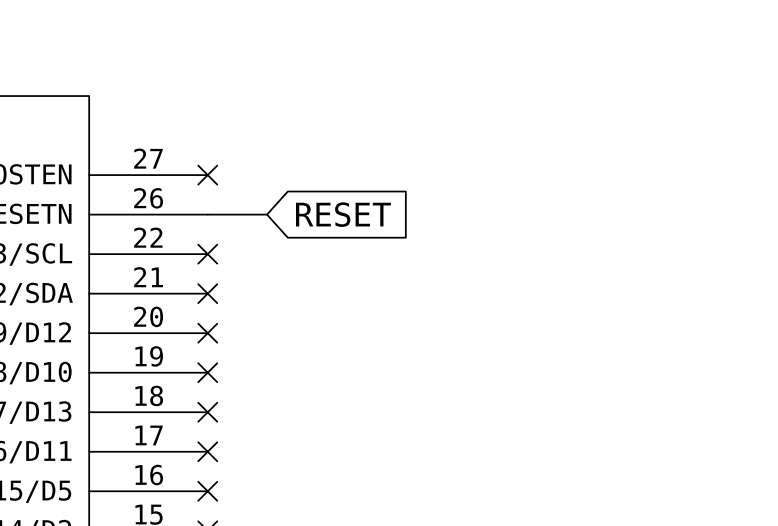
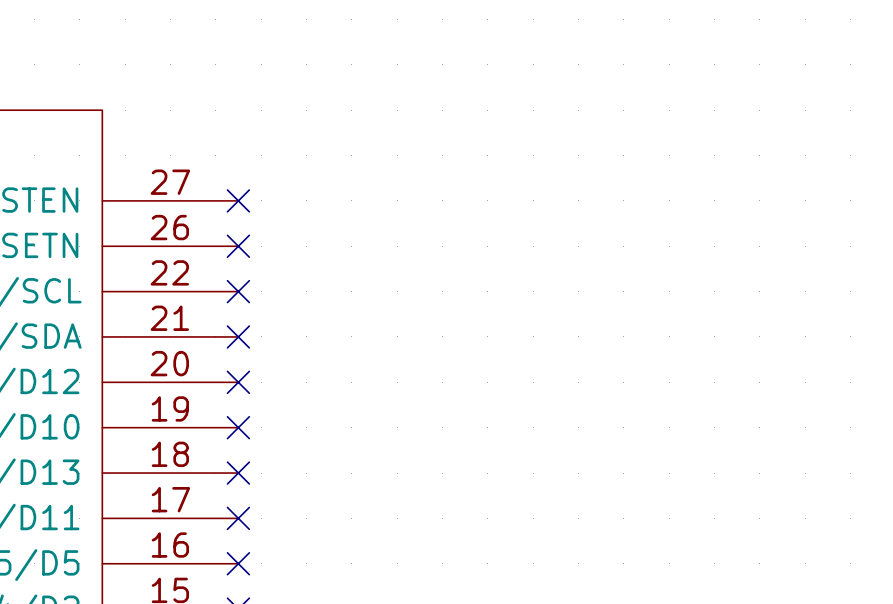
wire: (207, 214) (267, 214) -> none
no-connect mark: none -> (238, 246)
global label: RESET (343, 214) -> none

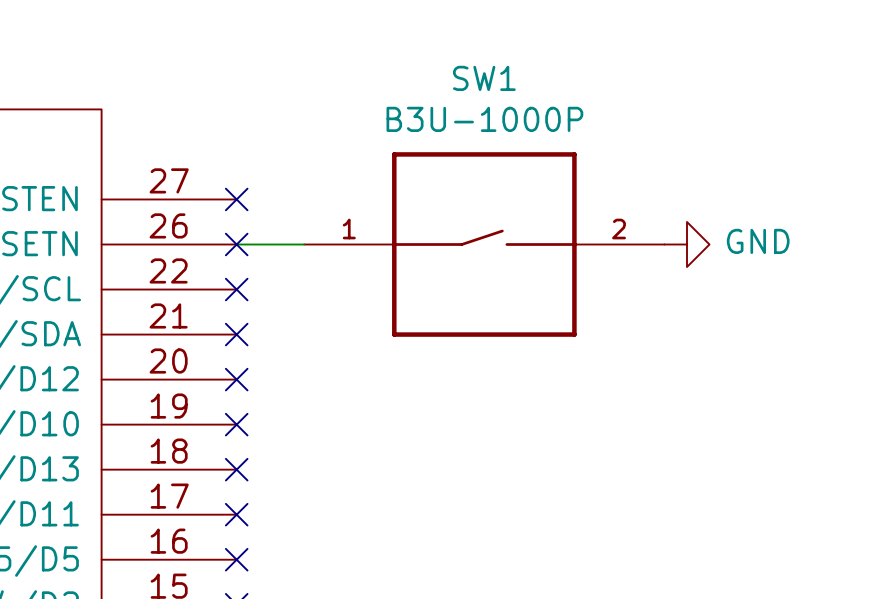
wire: none -> (236, 244) (304, 244)
SW1: none -> B3U-1000P (484, 244)
power symbol: none -> GND (687, 244)

